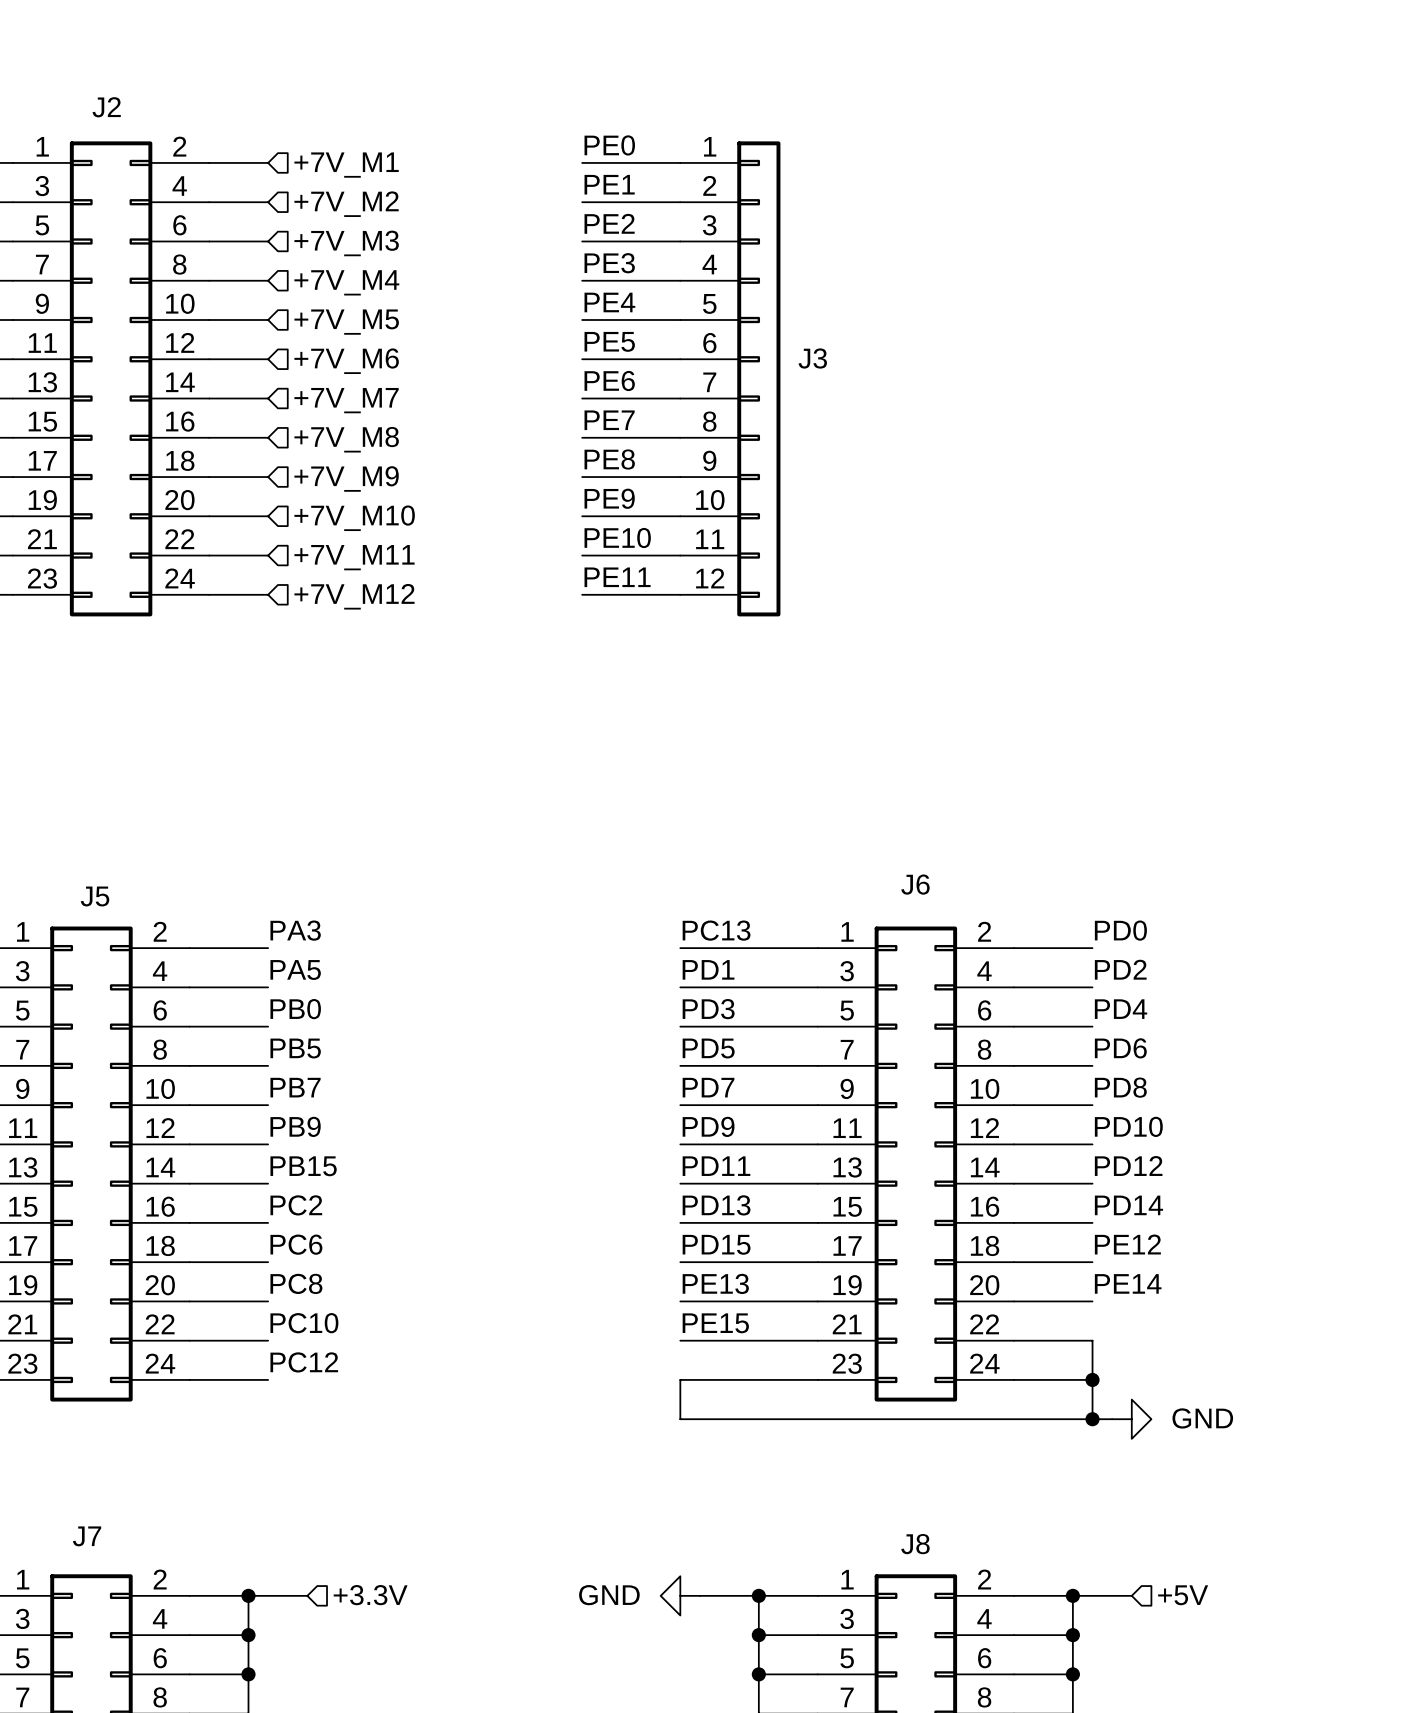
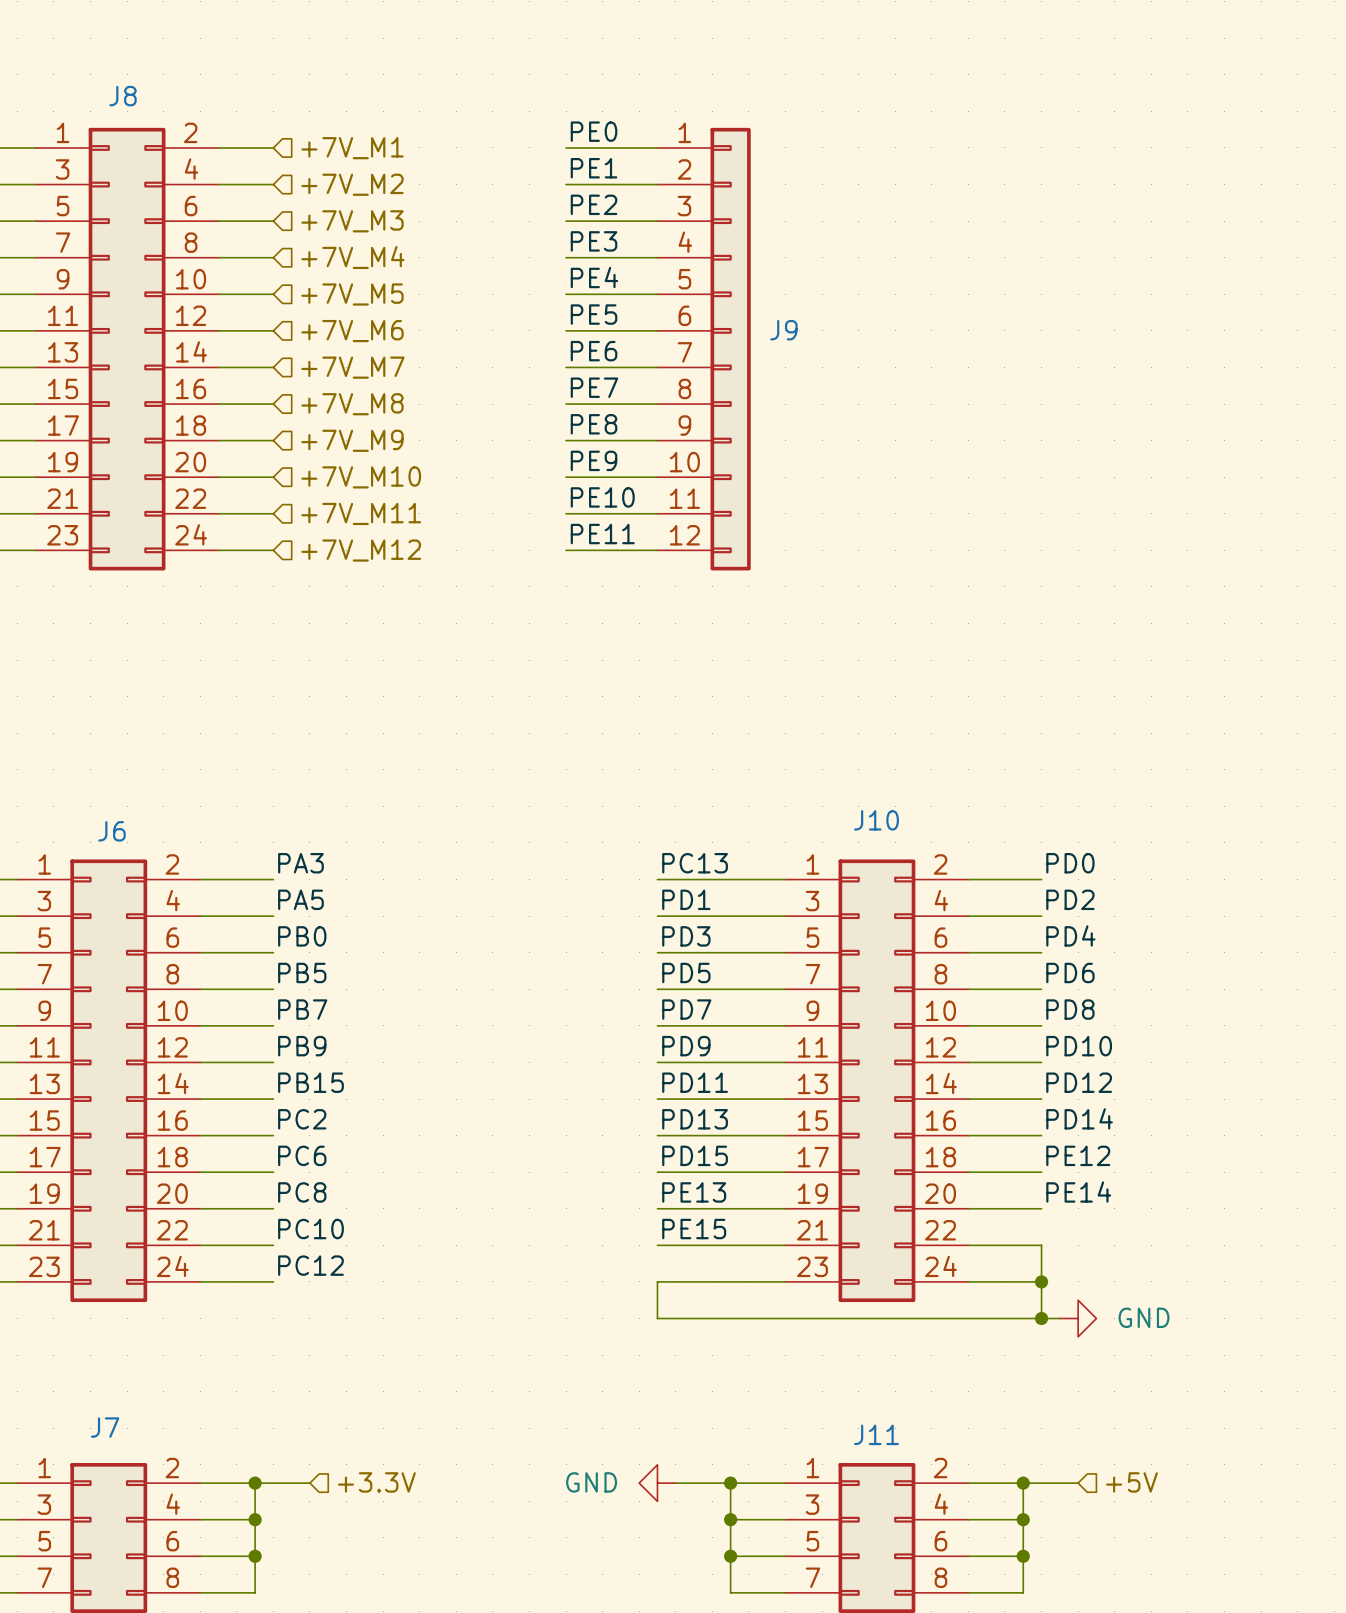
J2 name: J2 (106, 107) -> J8 (122, 96)
J3 name: J3 (812, 358) -> J9 (783, 330)
J6 name: J6 (915, 884) -> J10 (876, 820)
J5 name: J5 (95, 896) -> J6 (112, 831)
J8 name: J8 (915, 1544) -> J11 (876, 1434)

